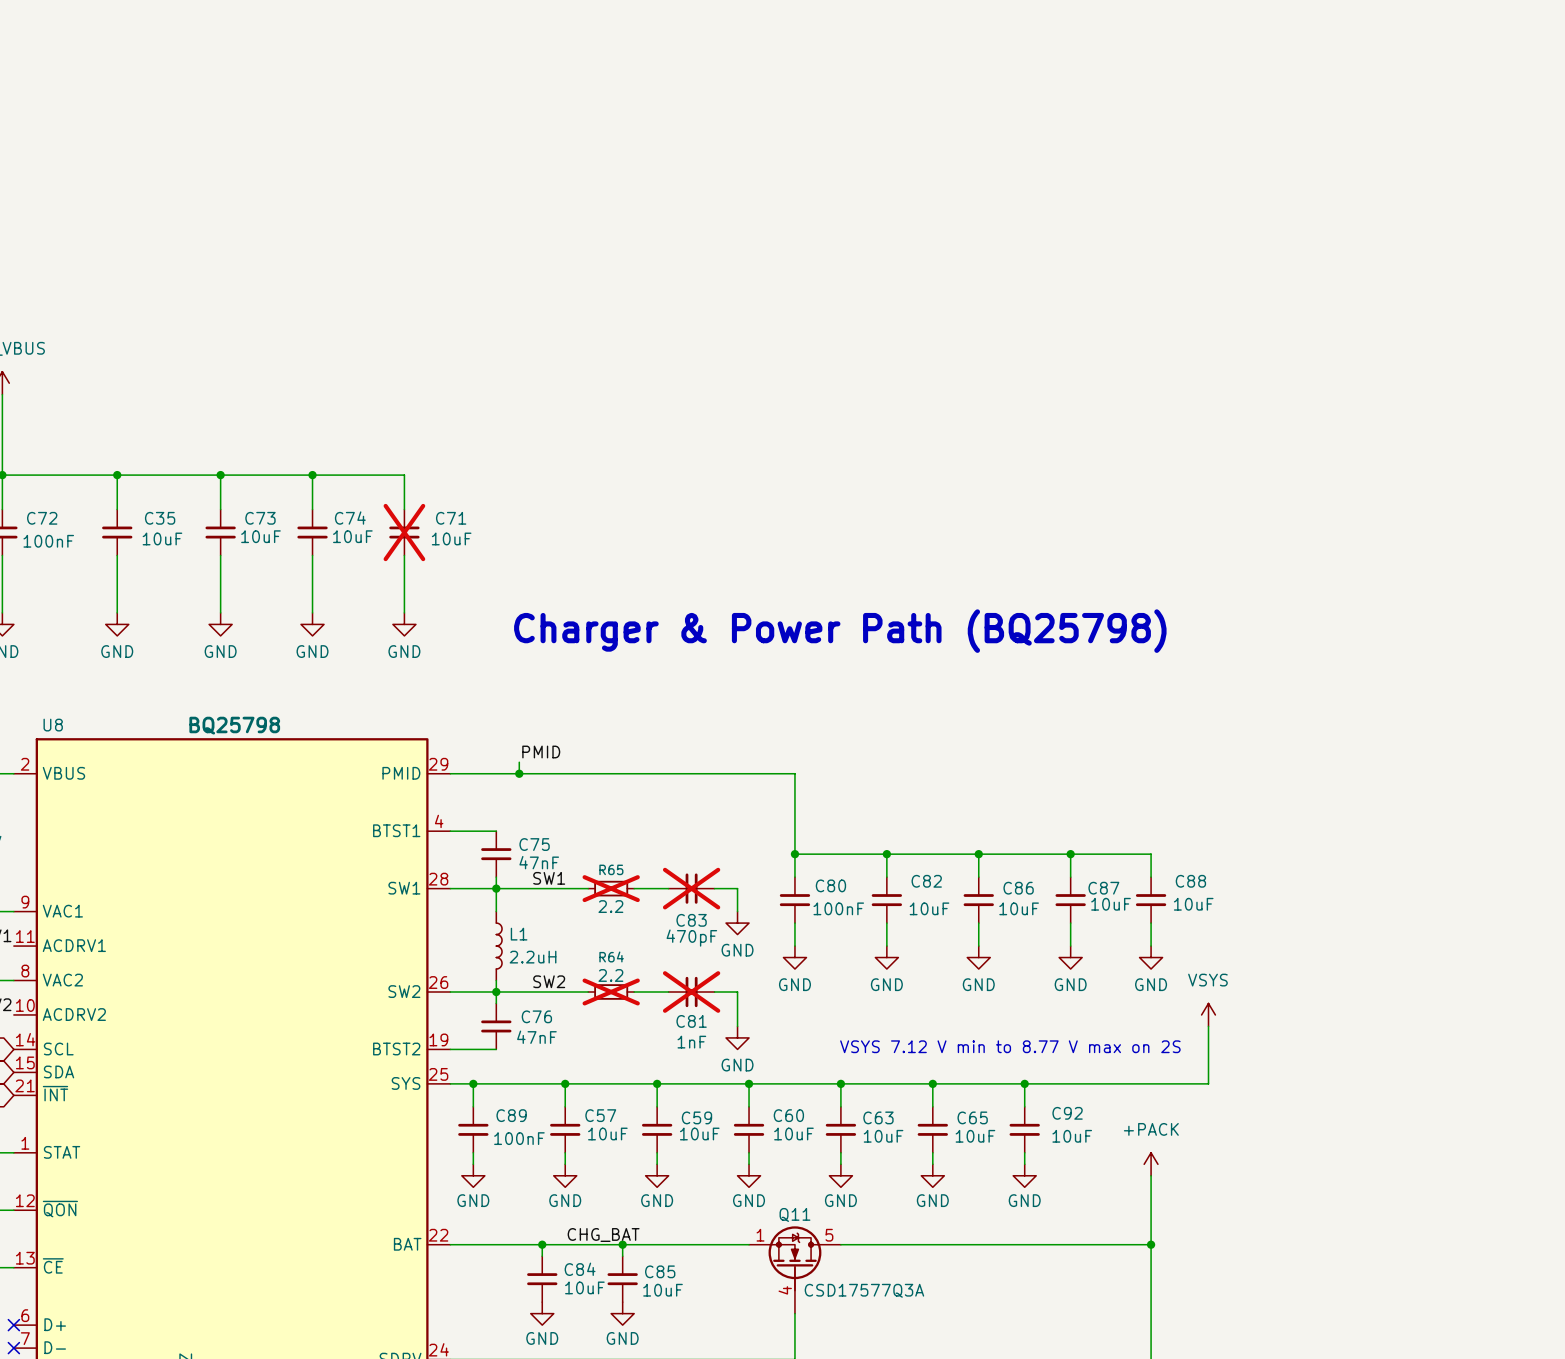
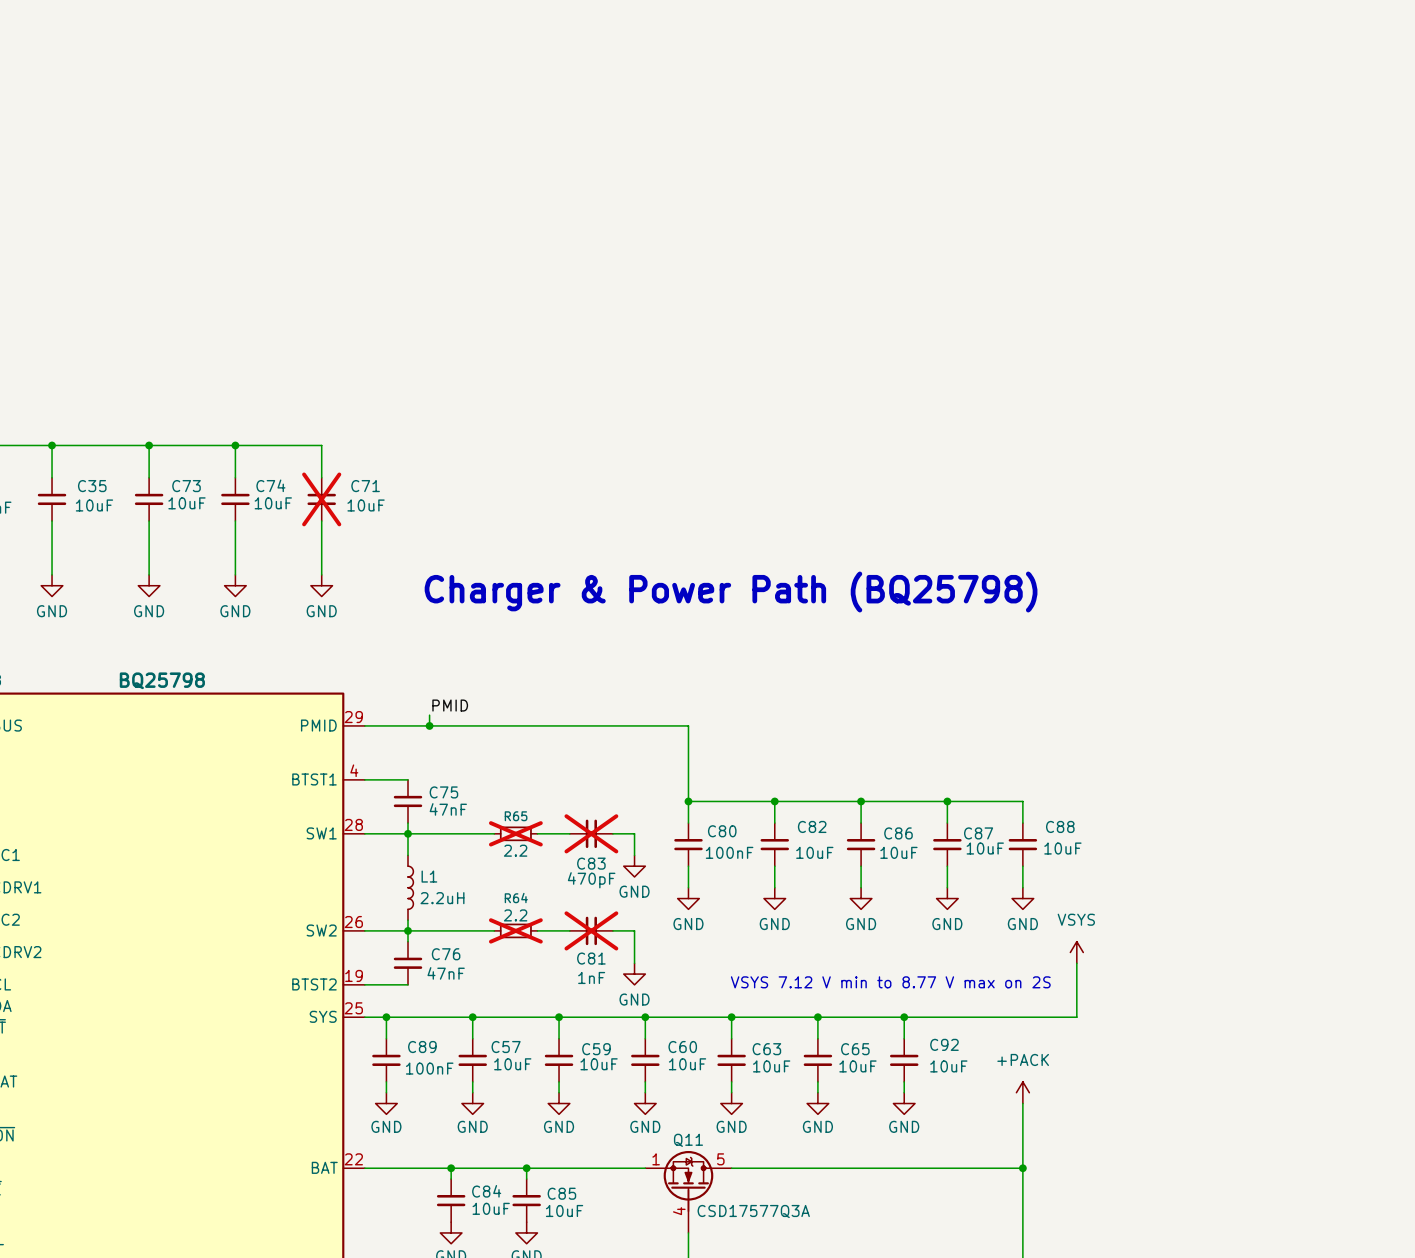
label: SW1 (549, 878) -> none
label: SW2 (549, 981) -> none
label: CHG_BAT (603, 1235) -> none

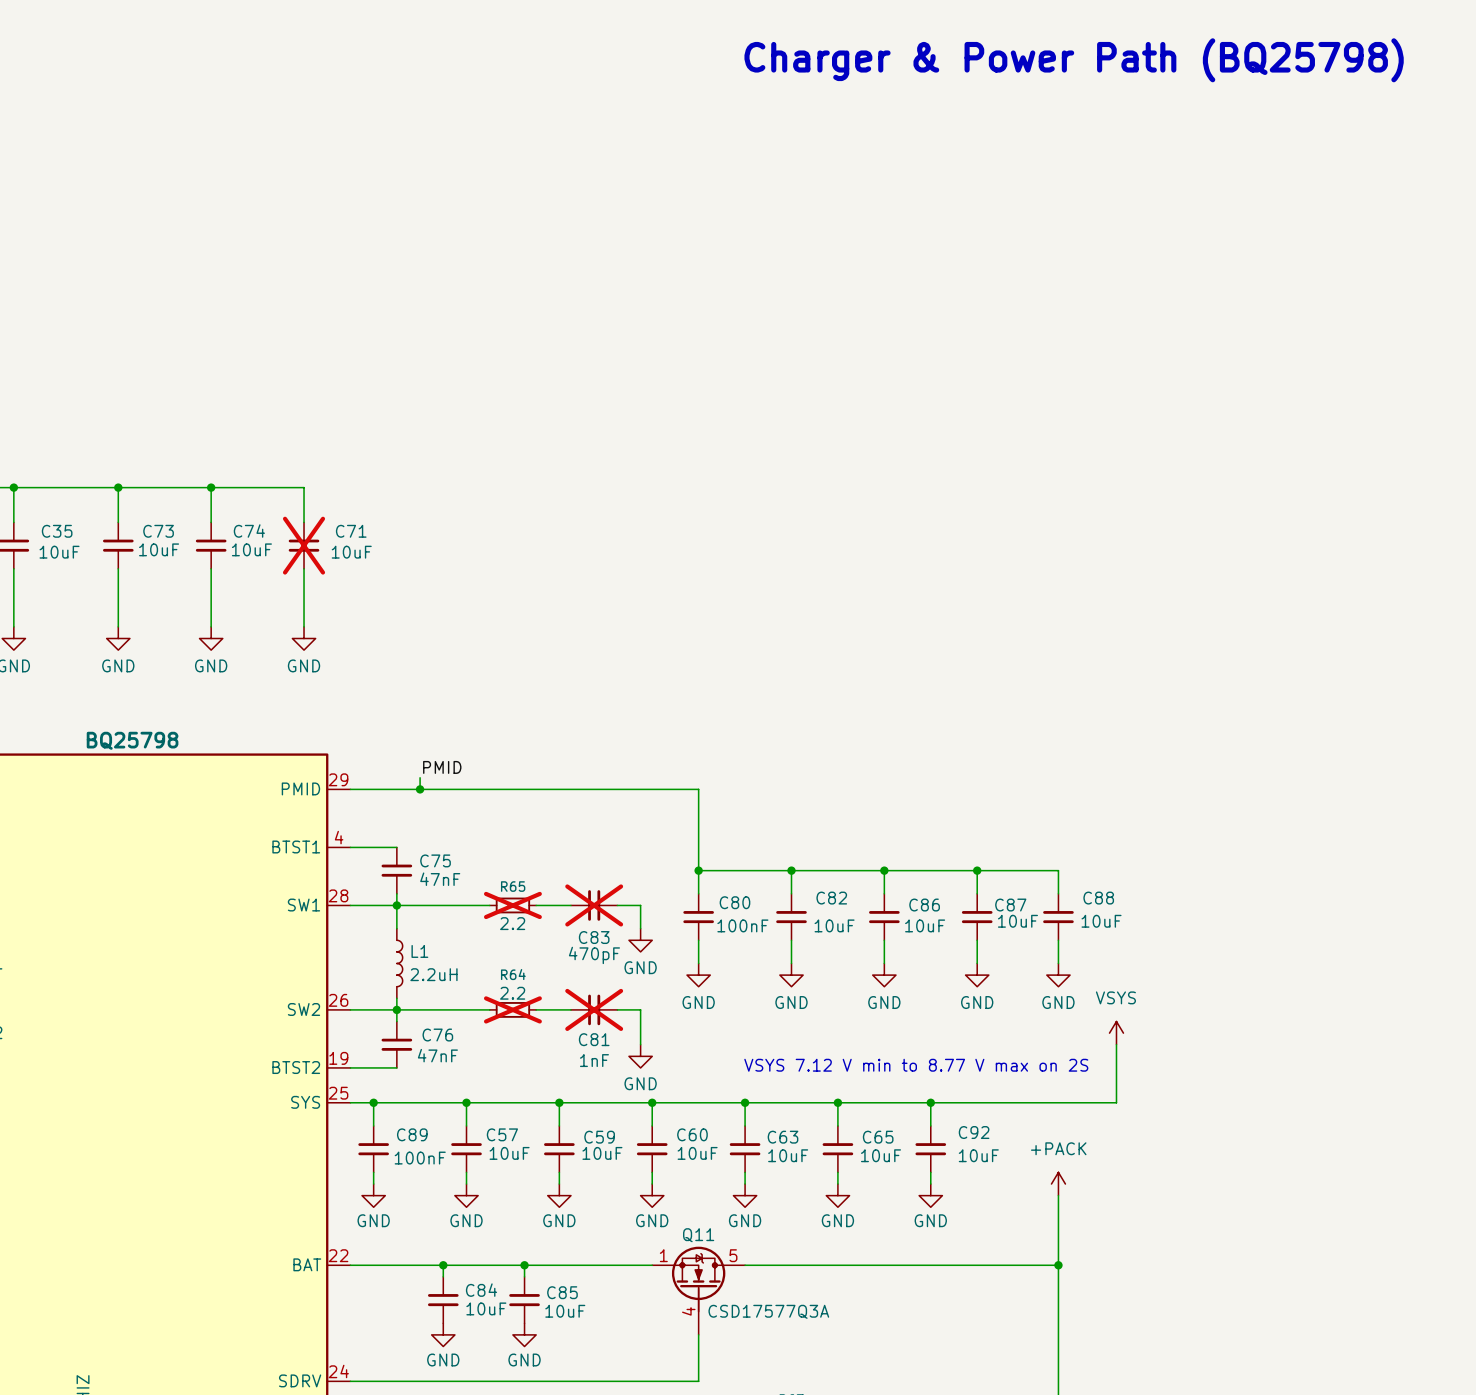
text: none -> Charger & Power Path (BQ25798) (1074, 60)
text: Charger & Power Path (BQ25798) (731, 592) -> none

